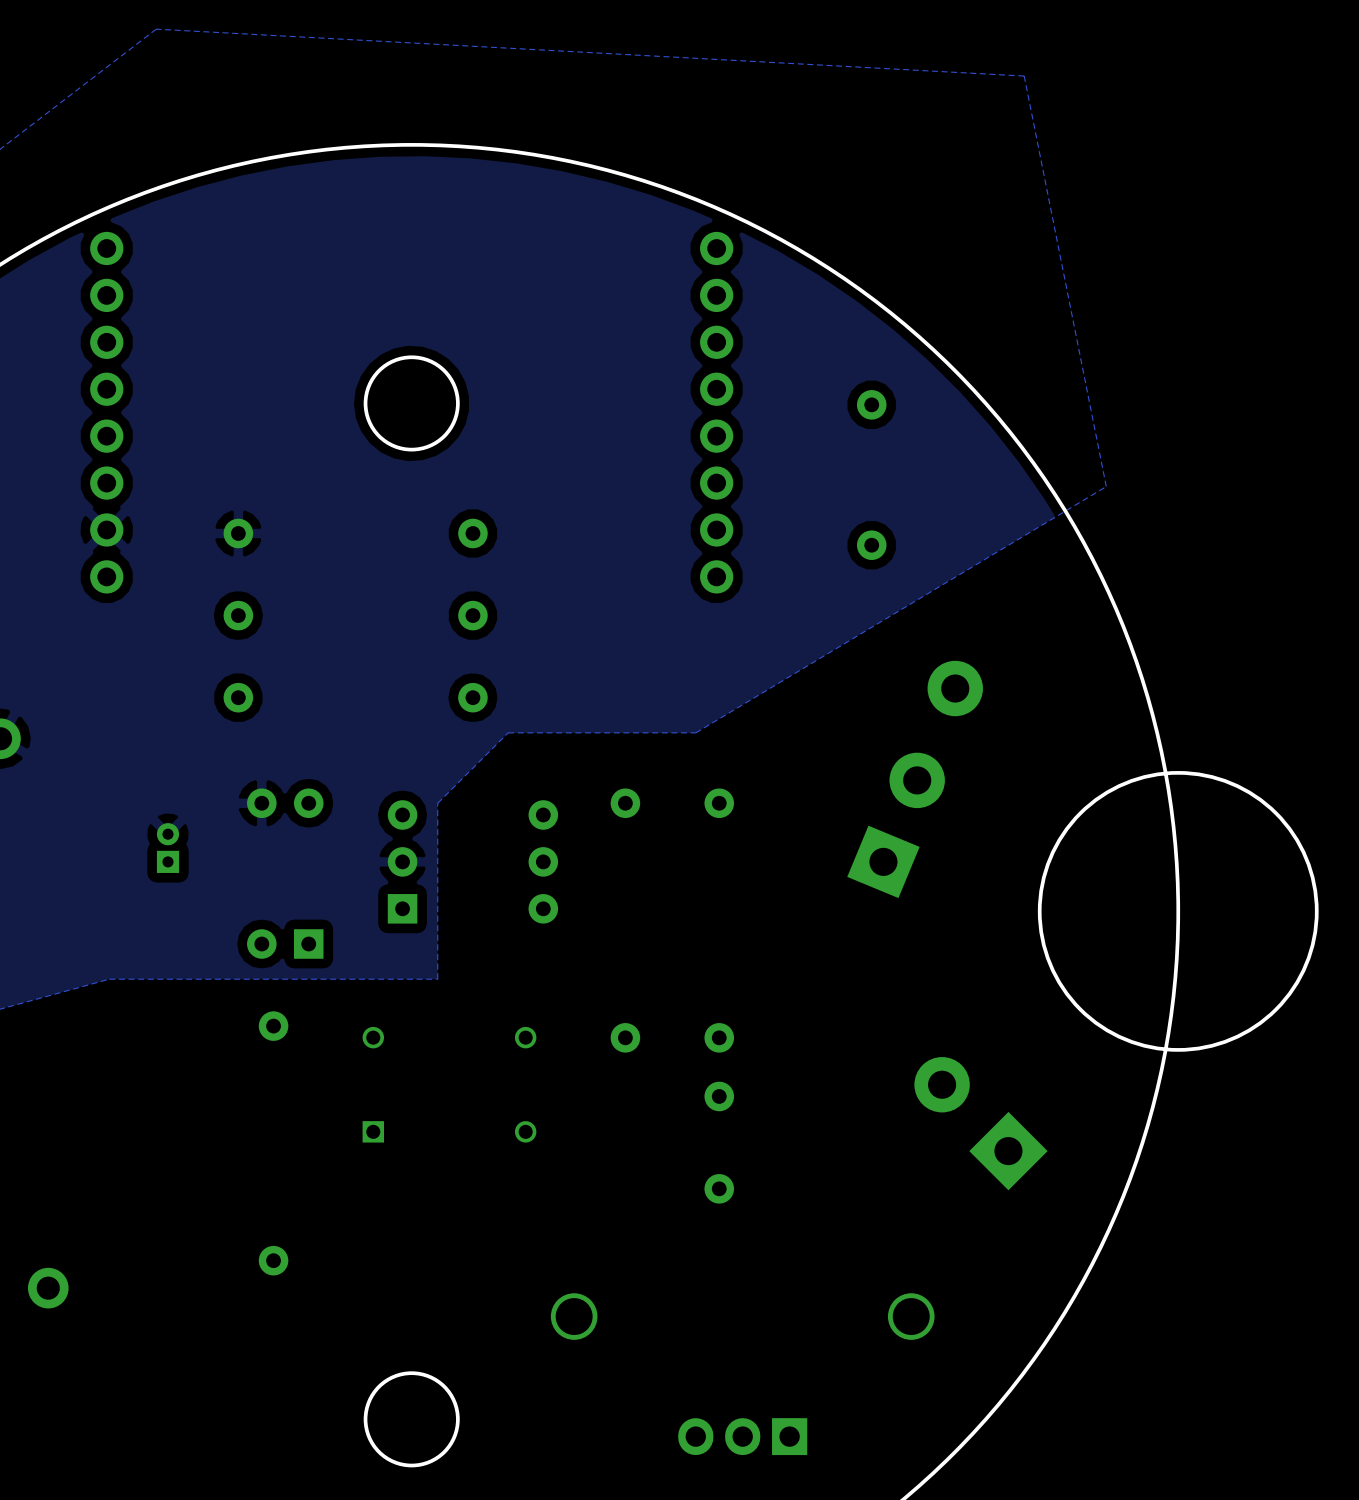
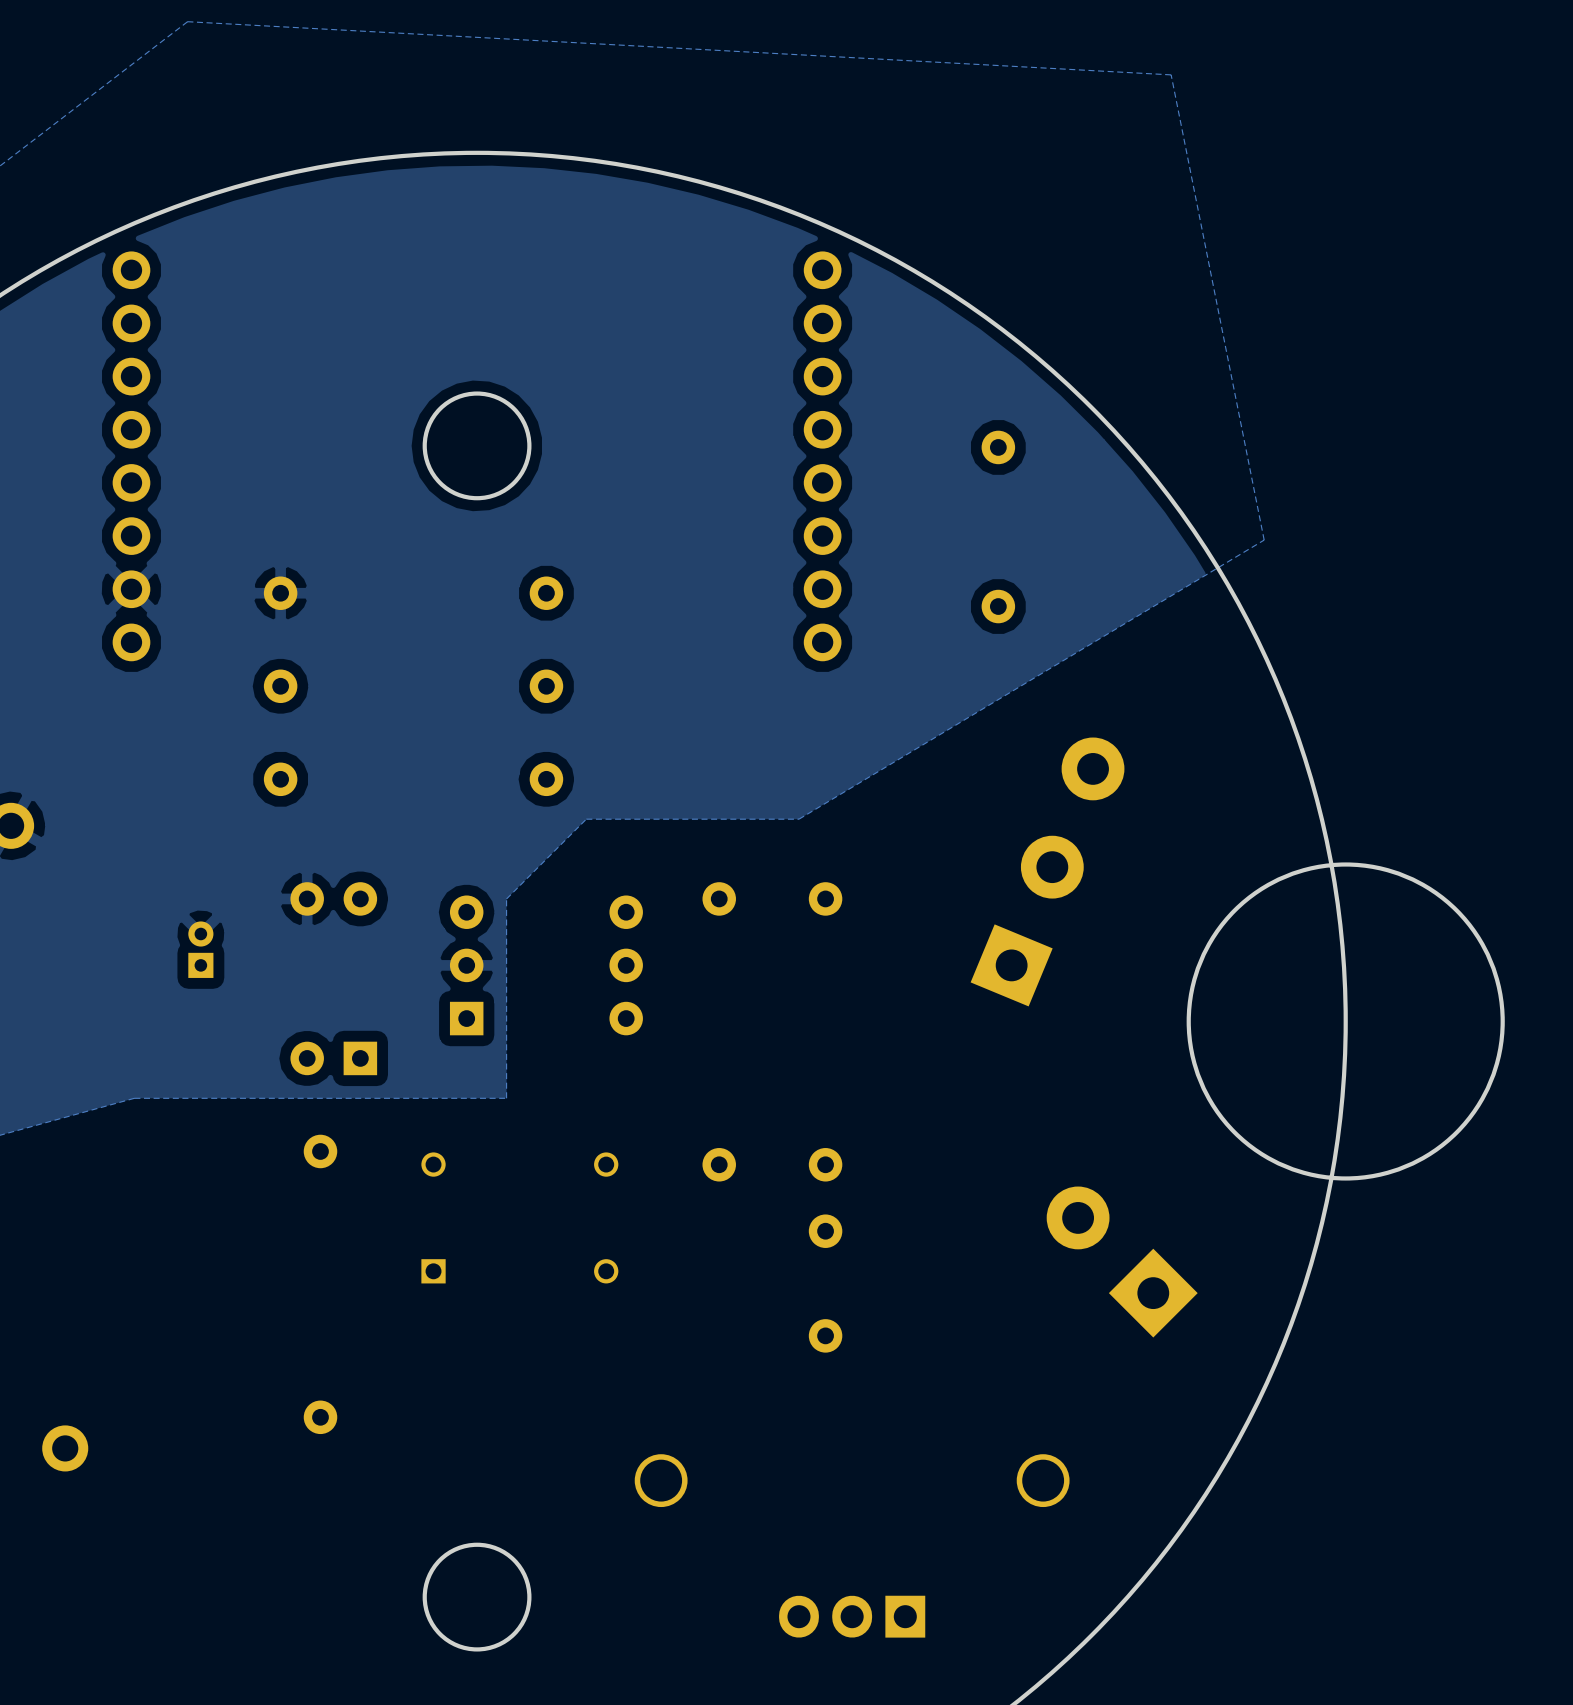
part footprint: [847, 660, 983, 899] -> [970, 737, 1125, 1007]

